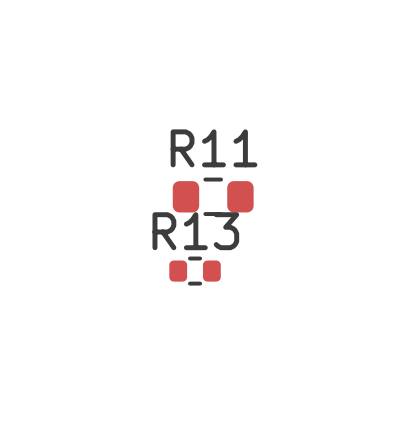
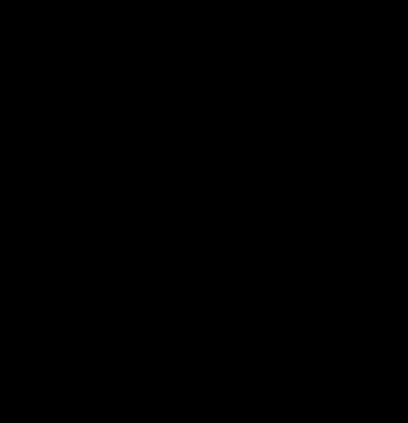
R11: (213, 196) -> none
R13: (195, 271) -> none

